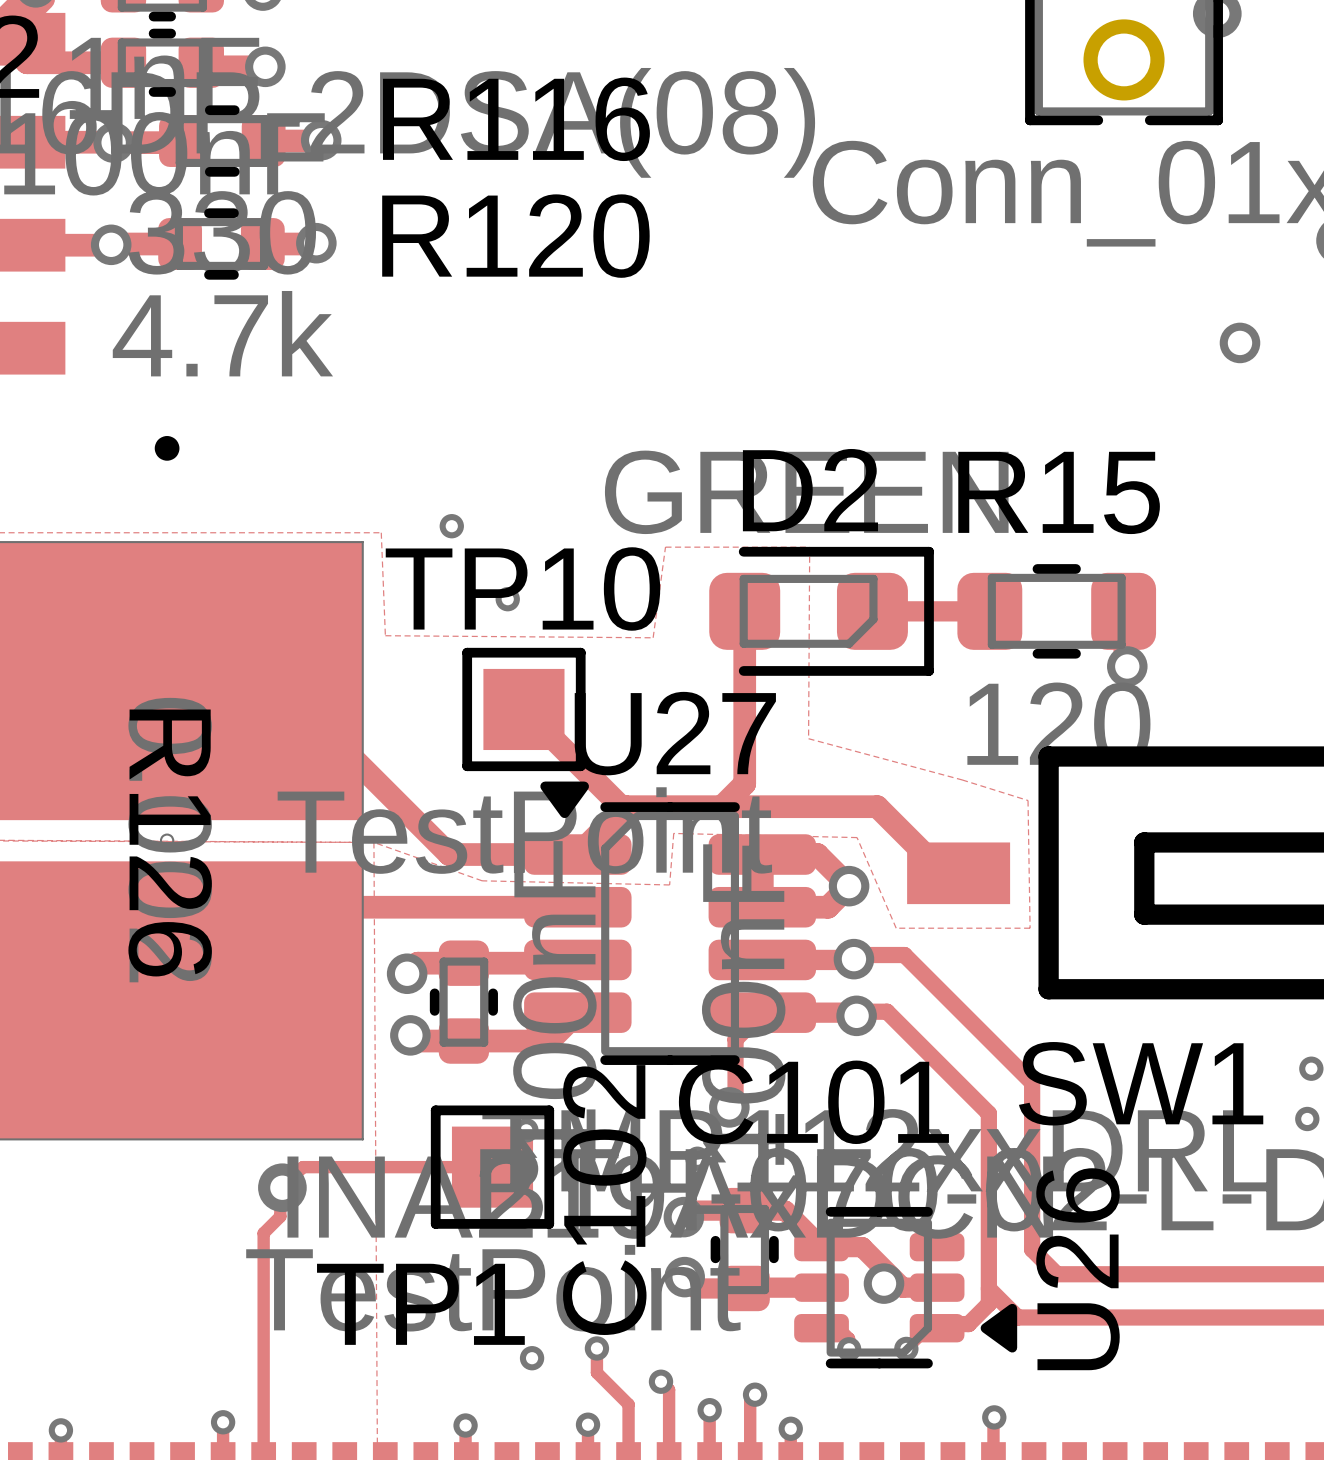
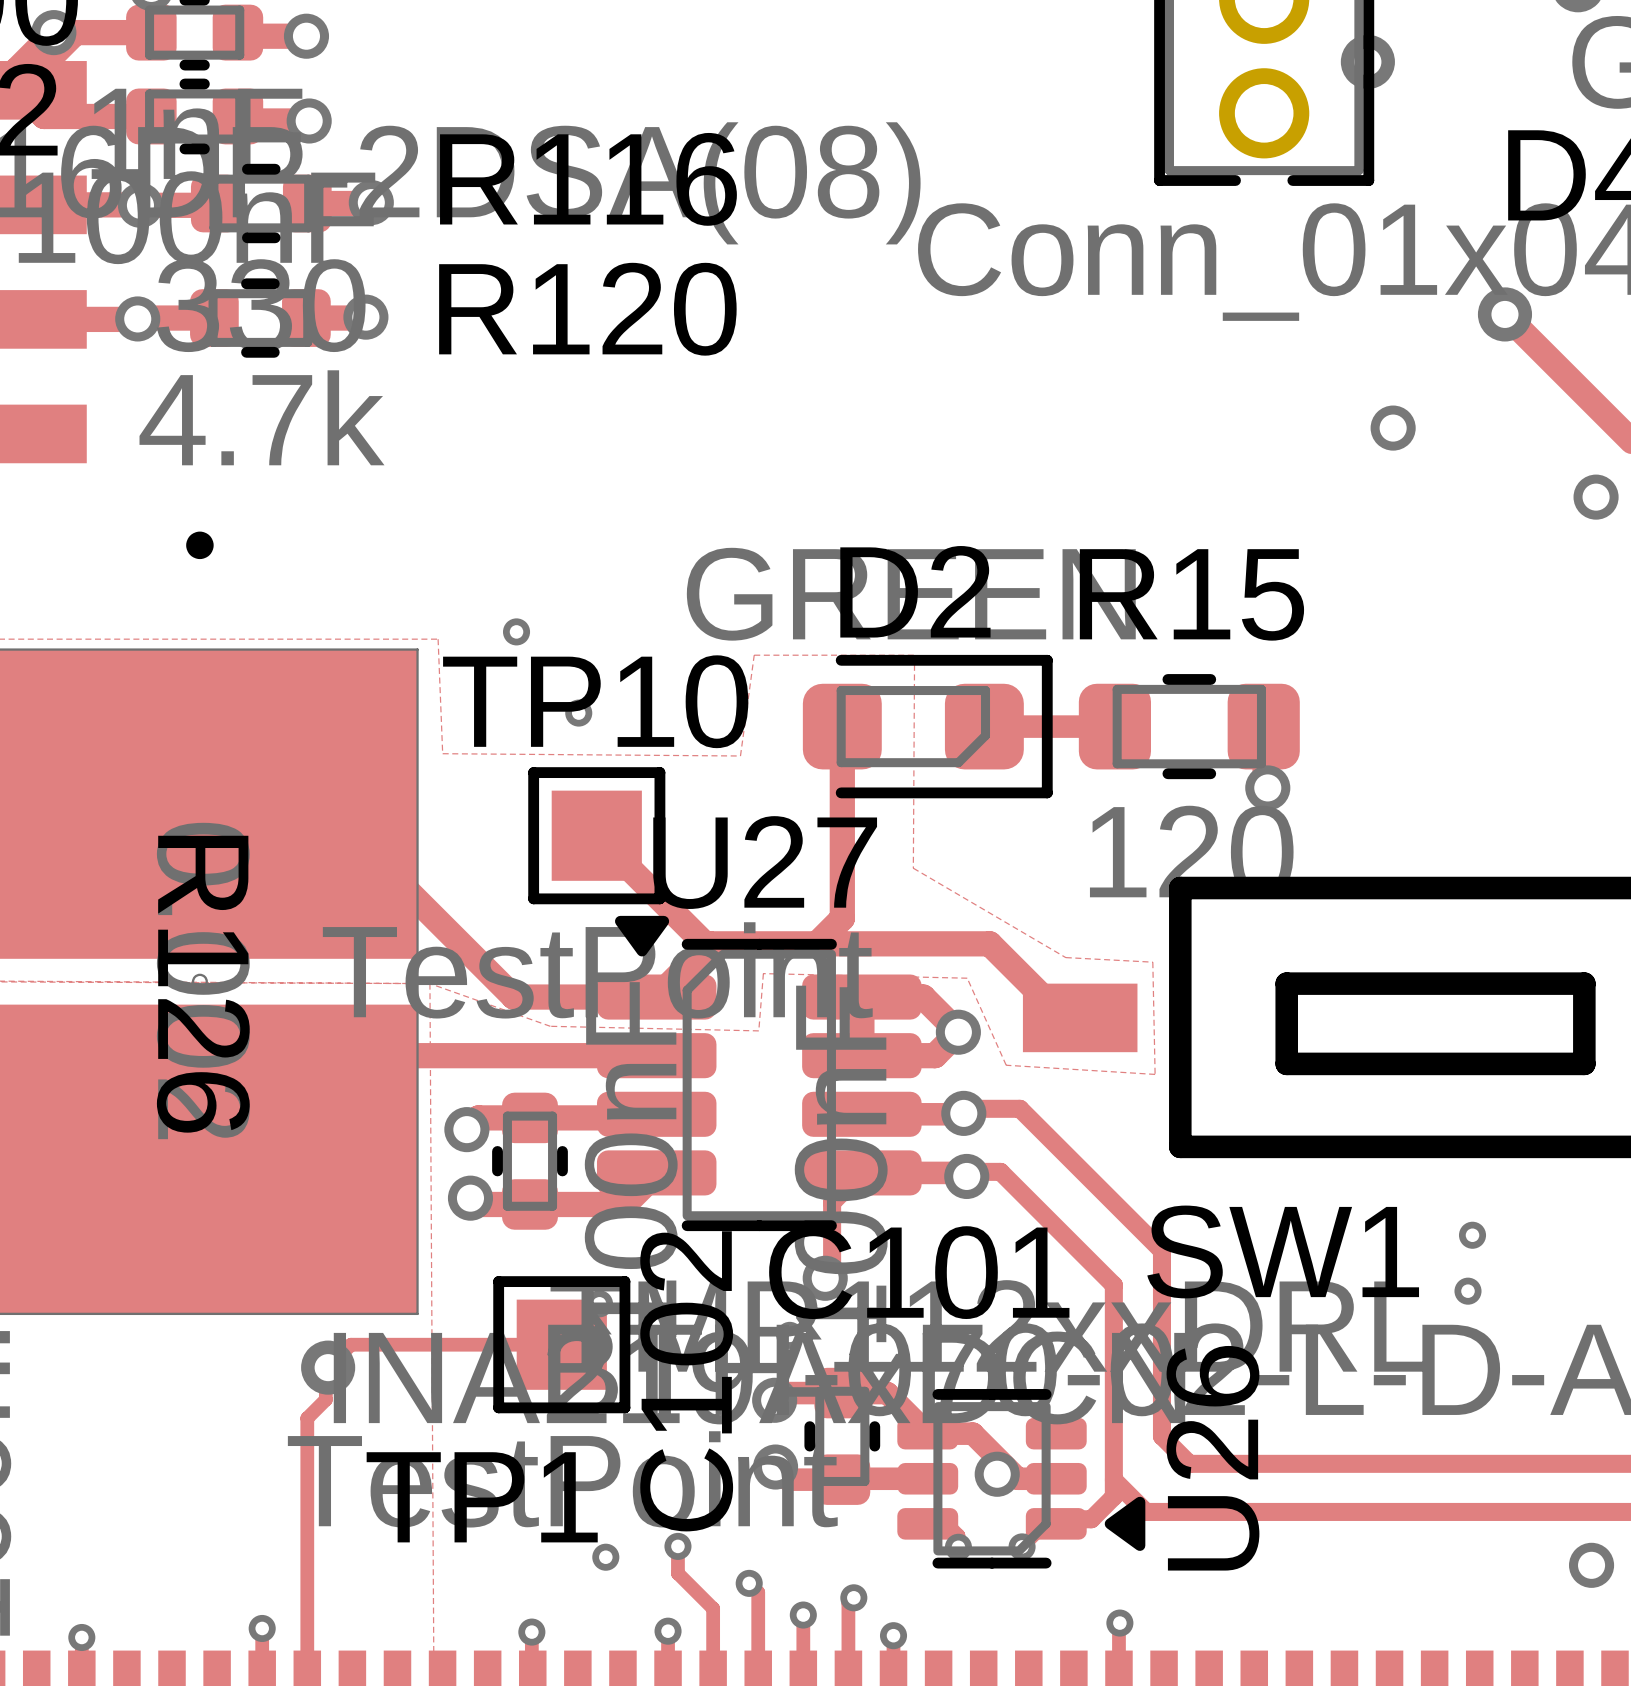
zone outline: (808, 738) (962, 779) (1028, 800) (1030, 928) (896, 928) (857, 837) -> (913, 868) (1065, 957) (1152, 962) (1155, 1074) (1006, 1065) (967, 978)

